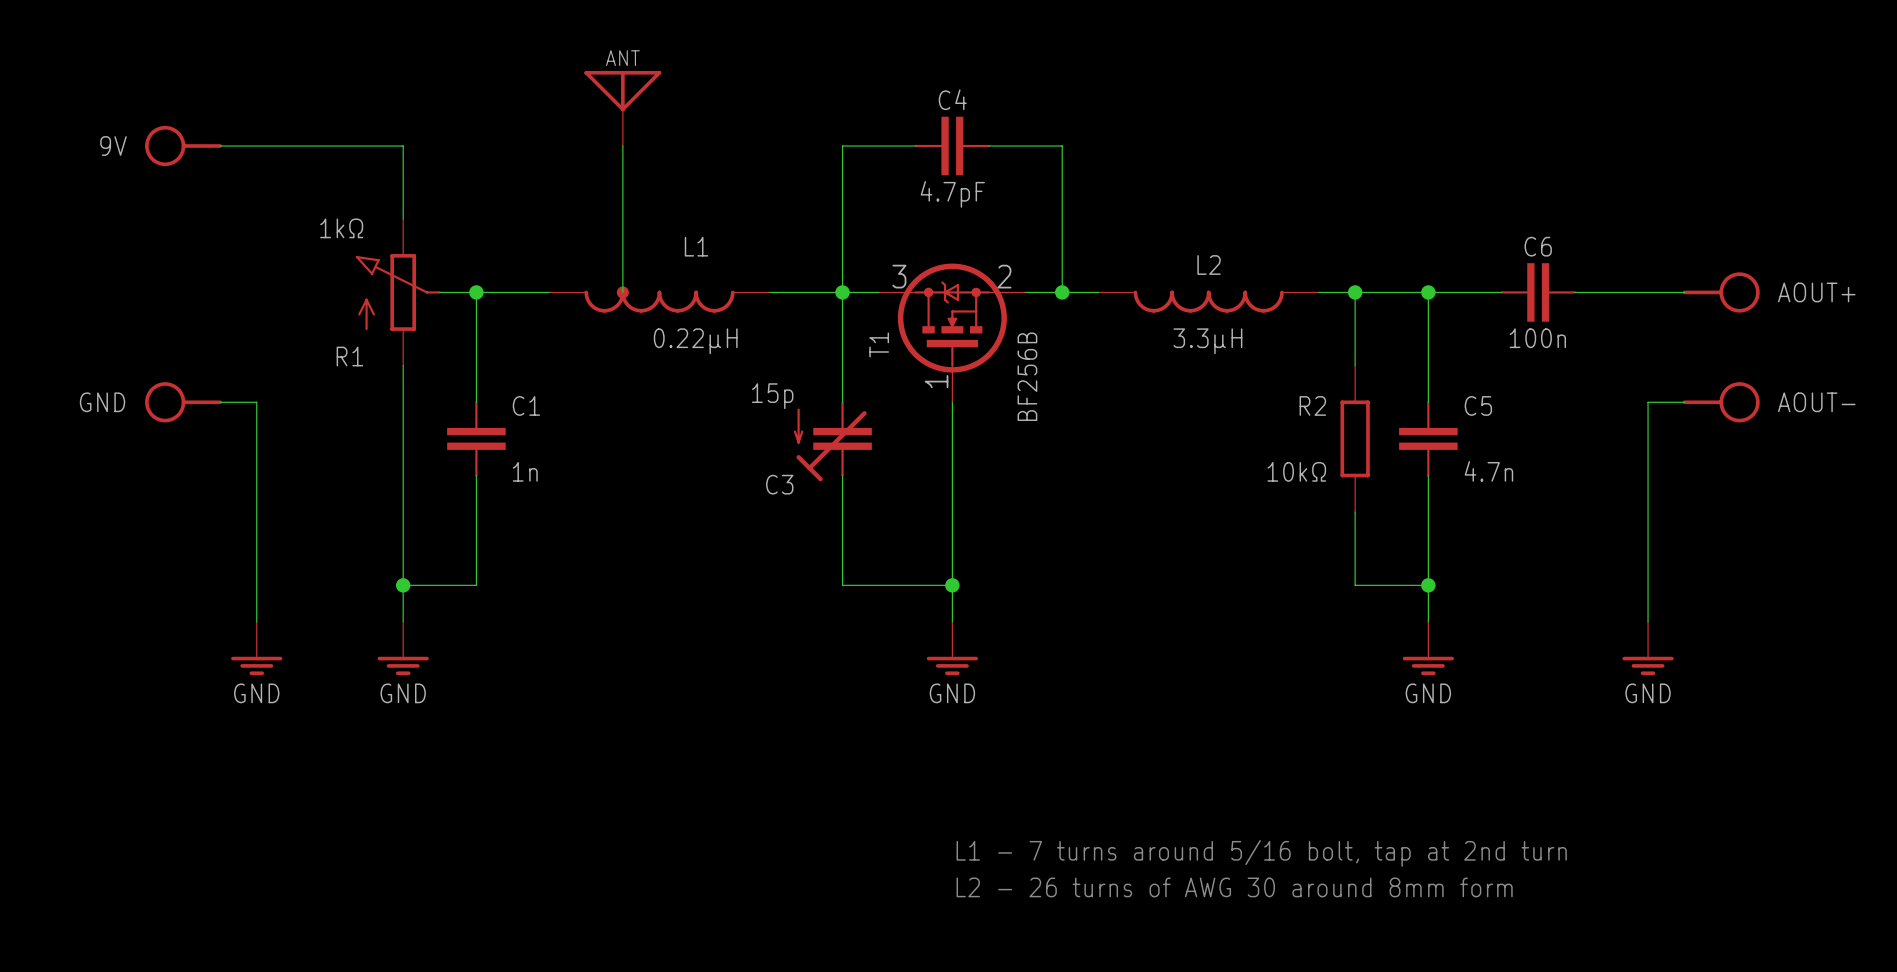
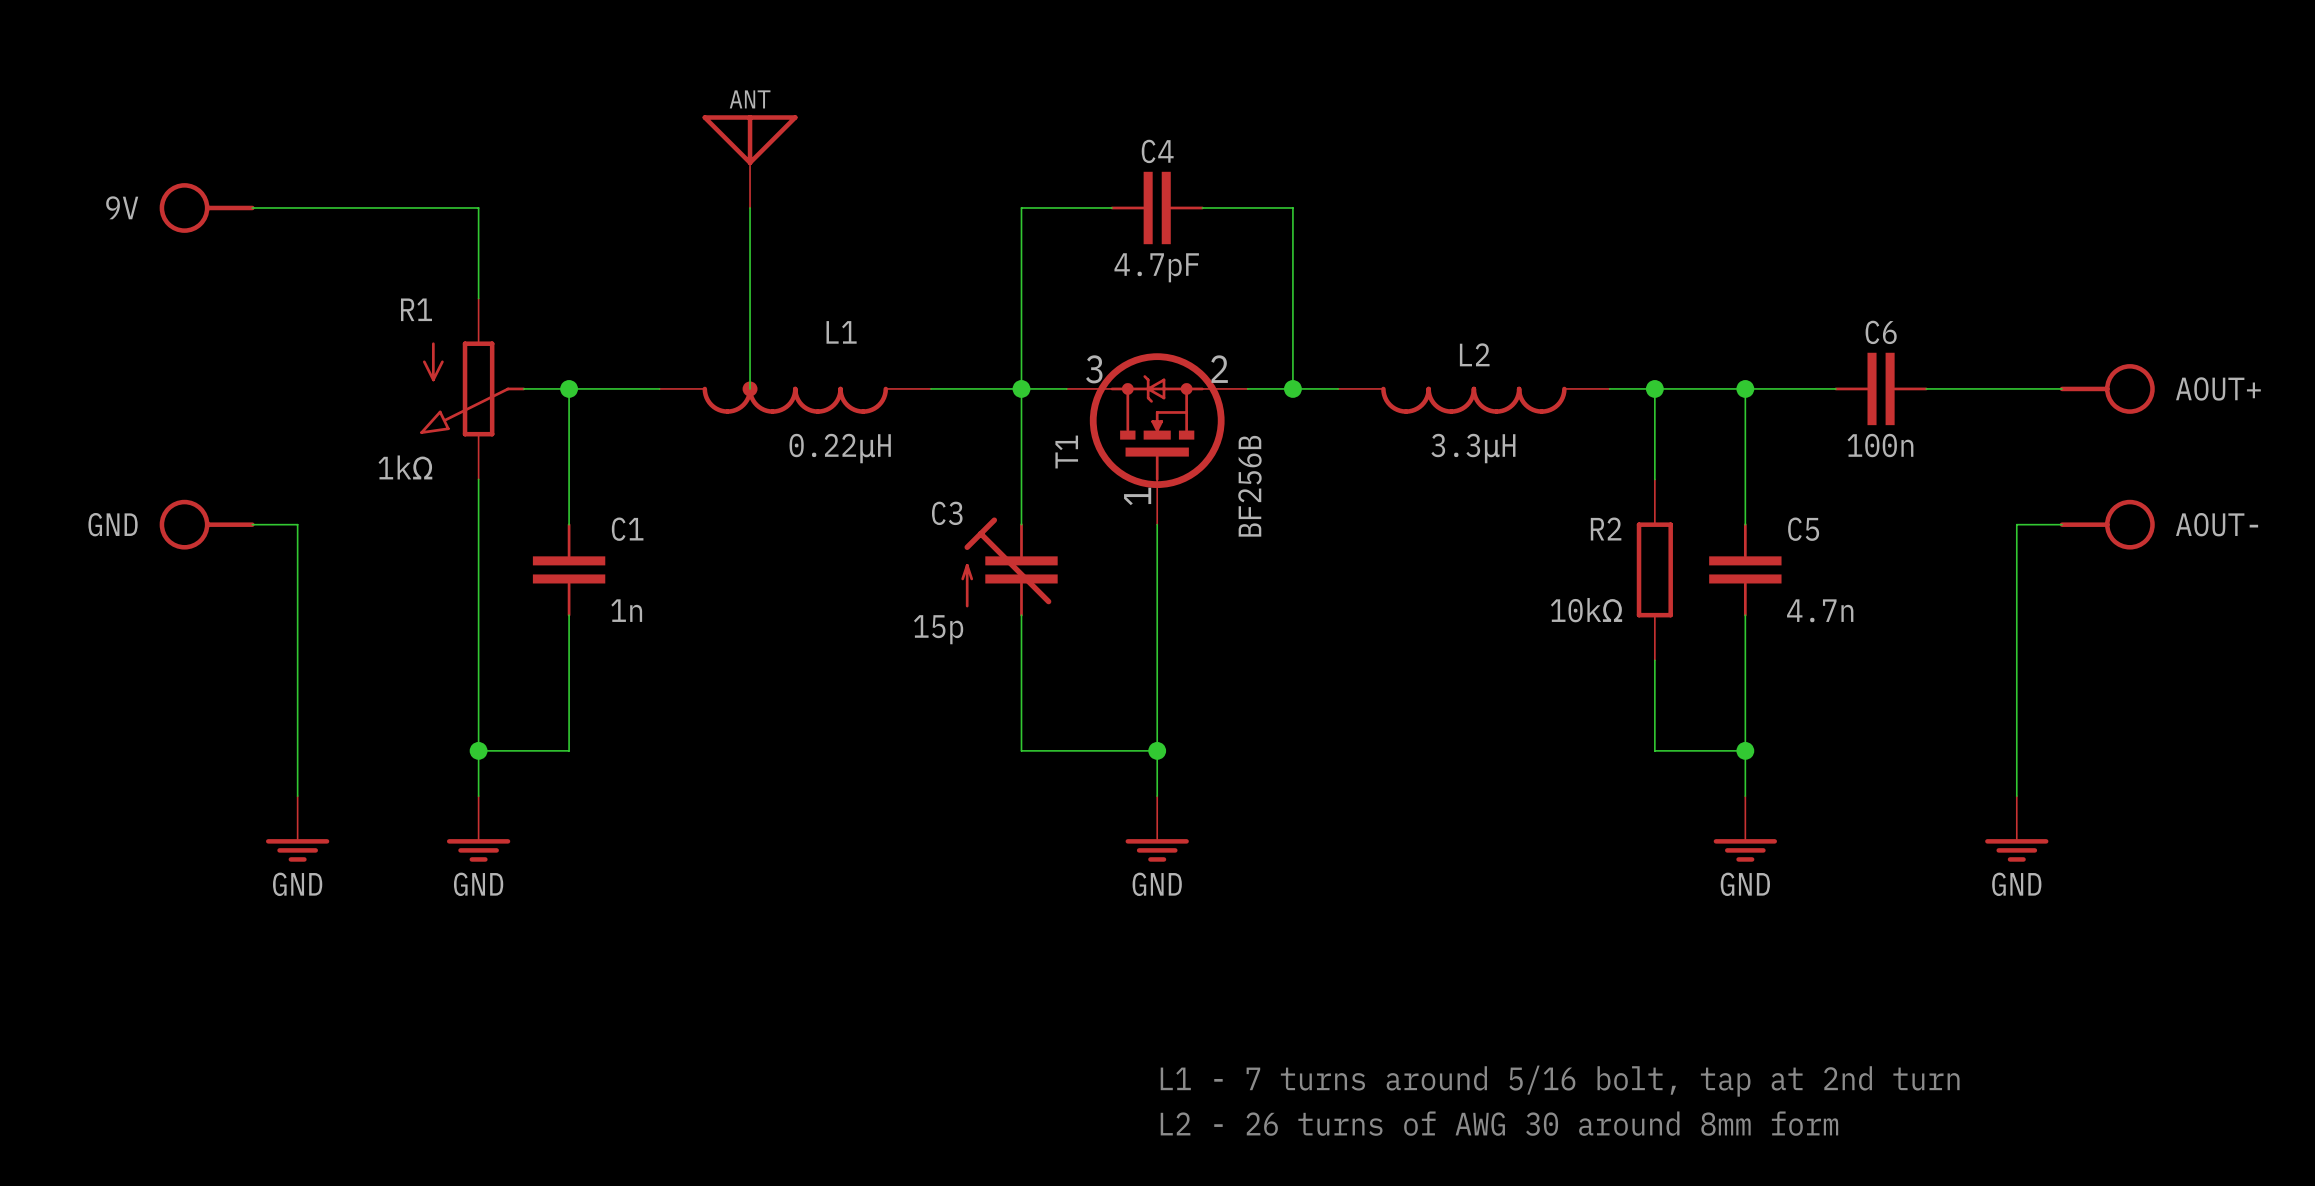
R1 flip: as is (398, 292) -> up-down (472, 388)
C3 flip: as is (832, 441) -> up-down (1009, 566)

